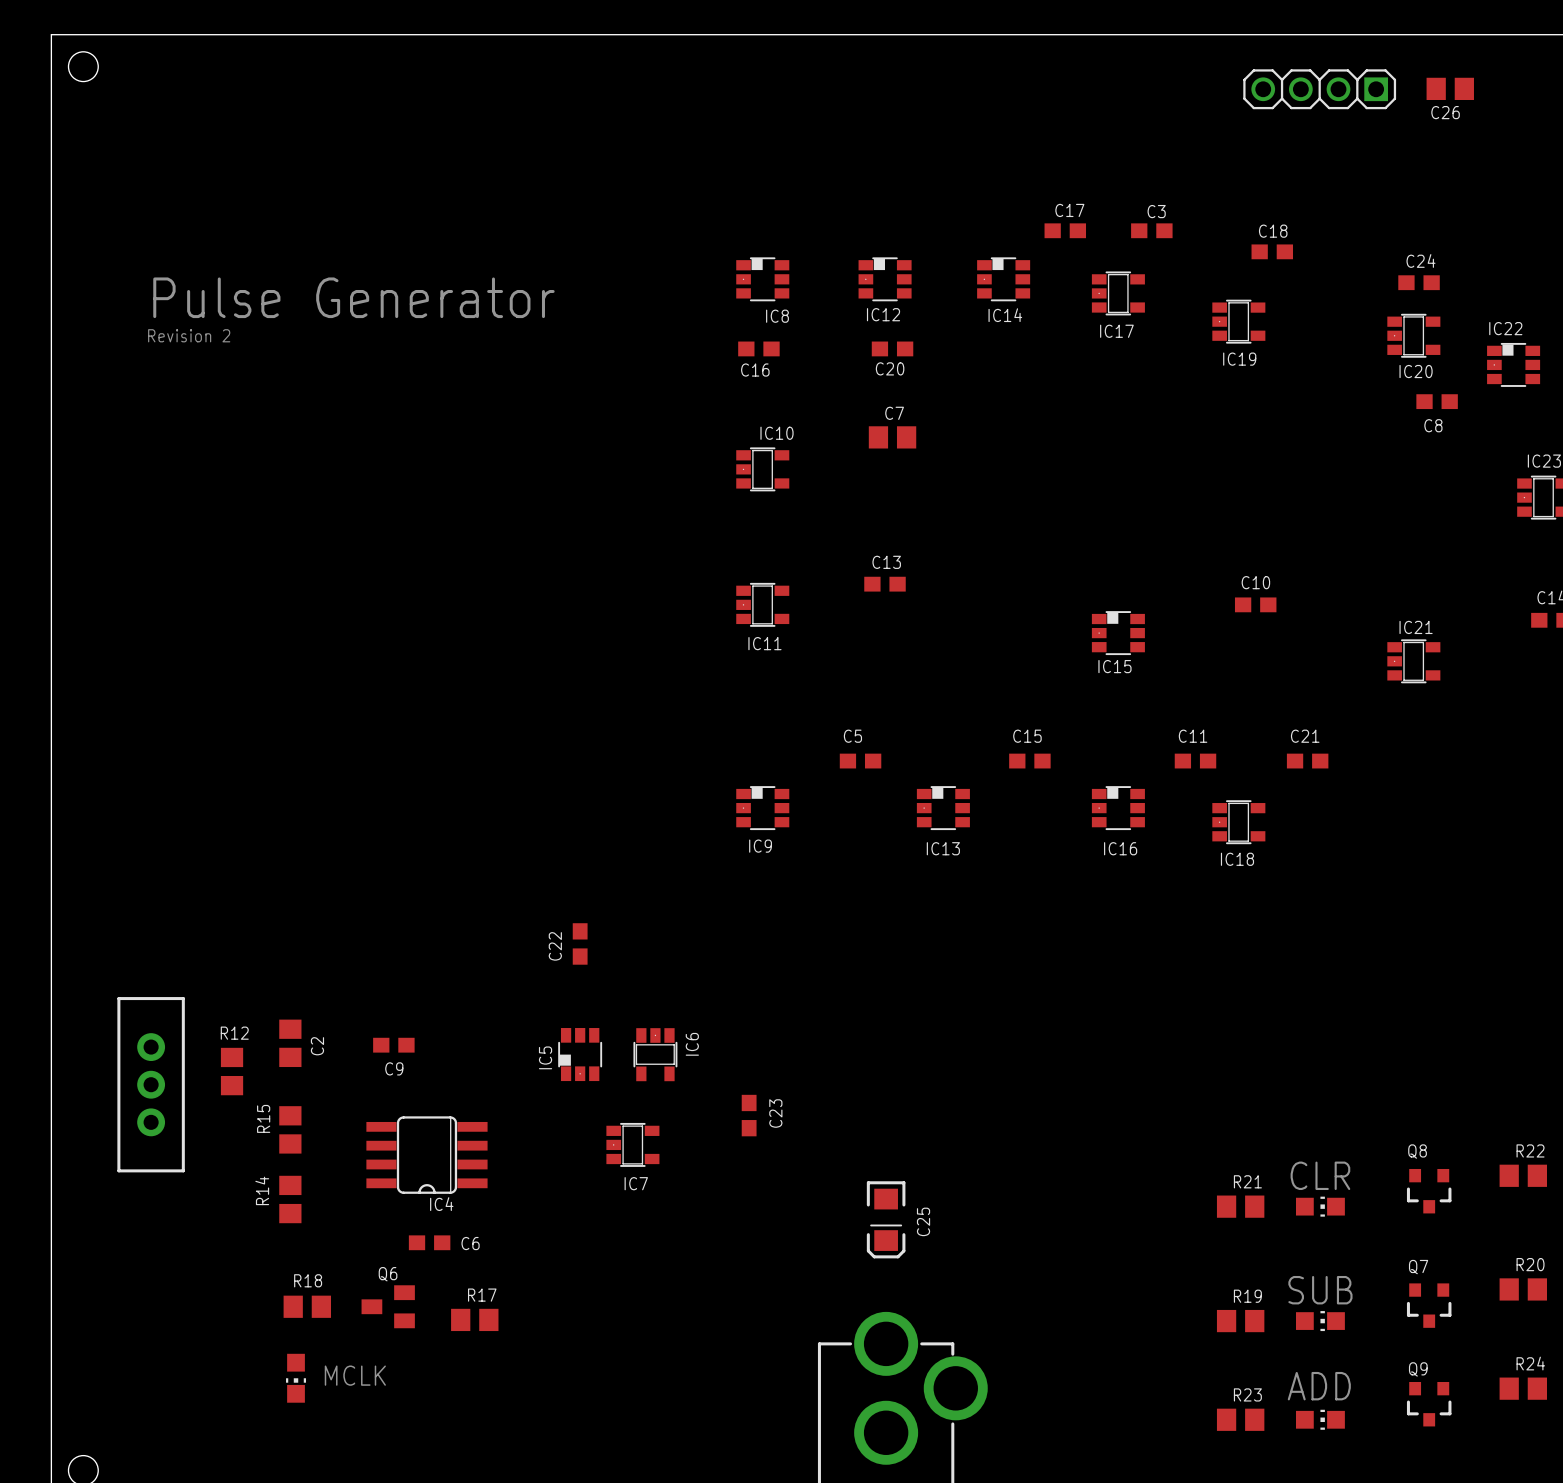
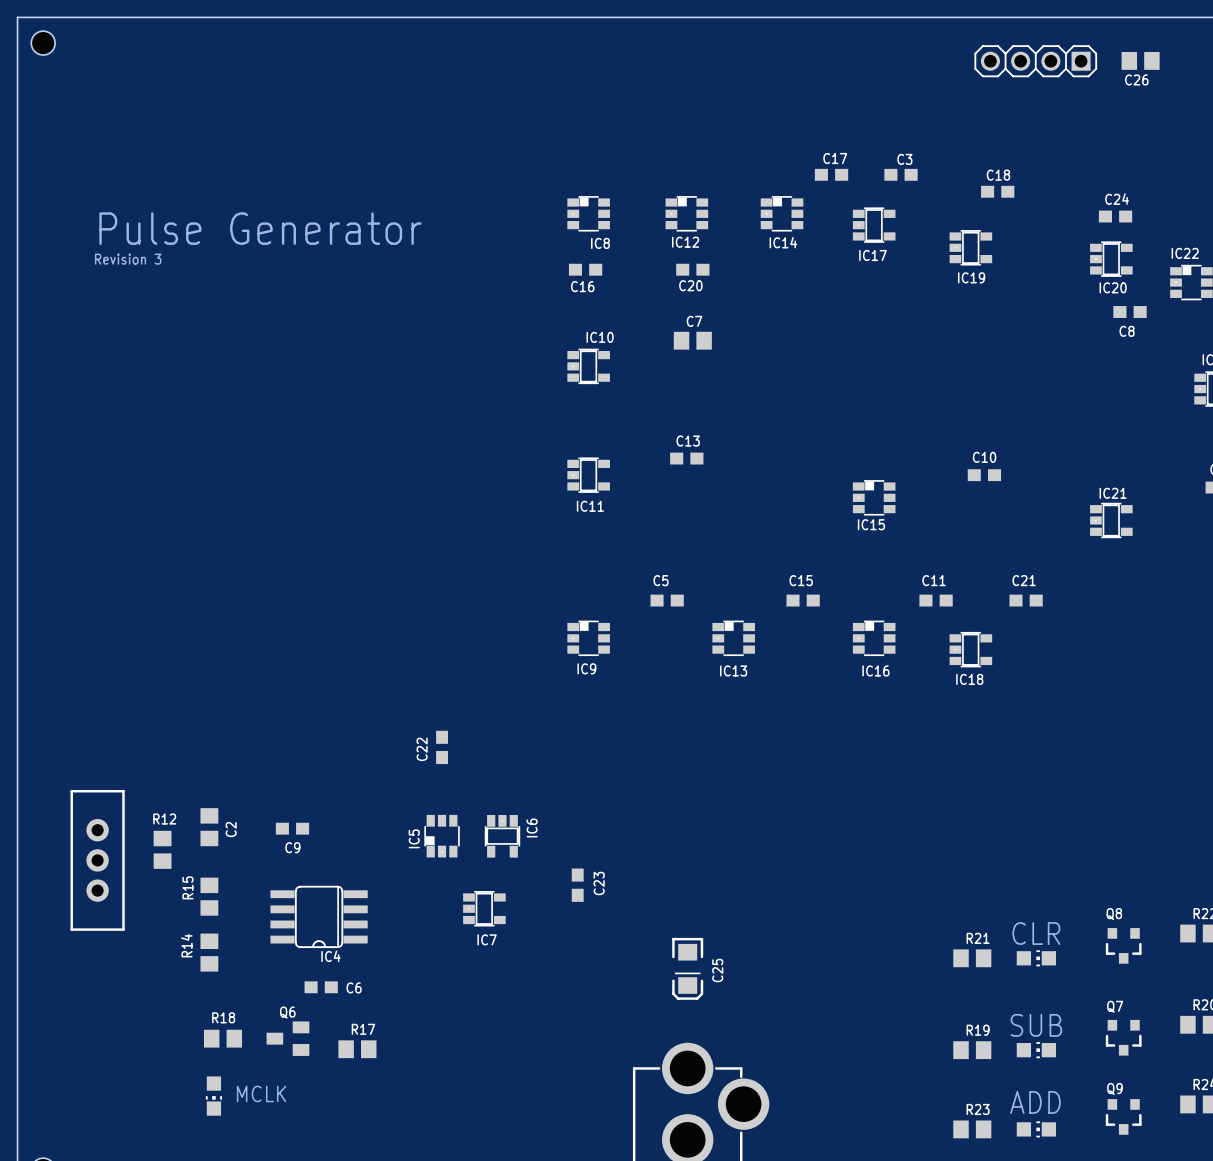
text: Revision 2 (189, 335) -> Revision 3 (128, 259)

